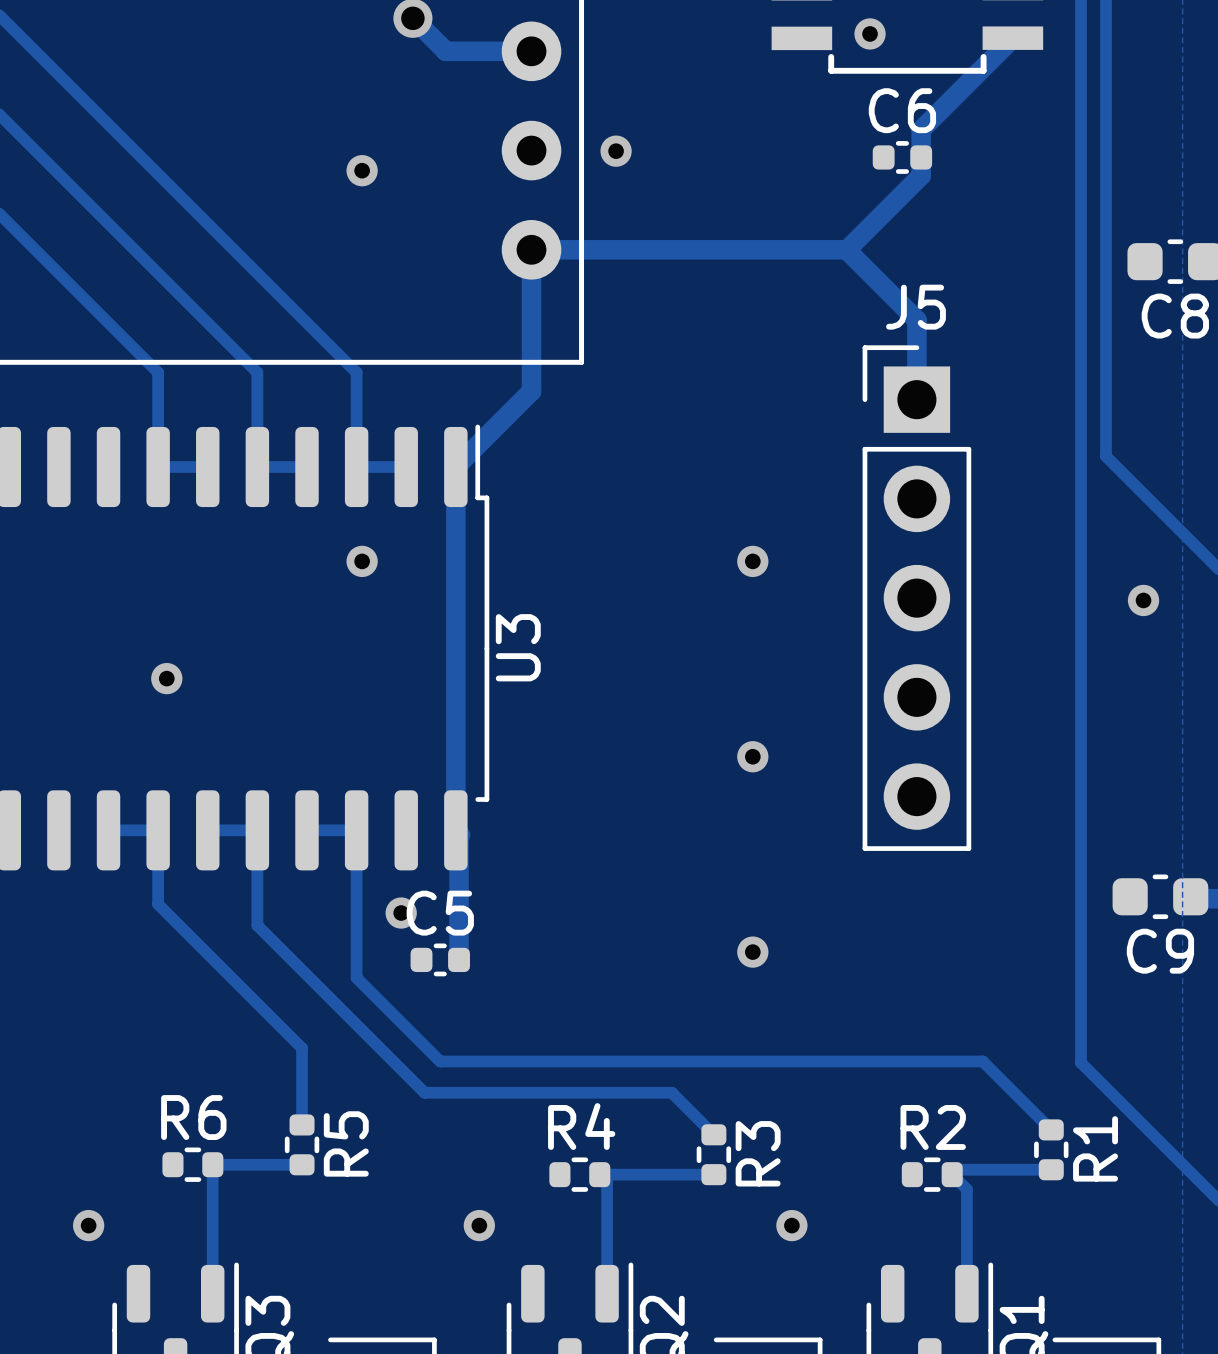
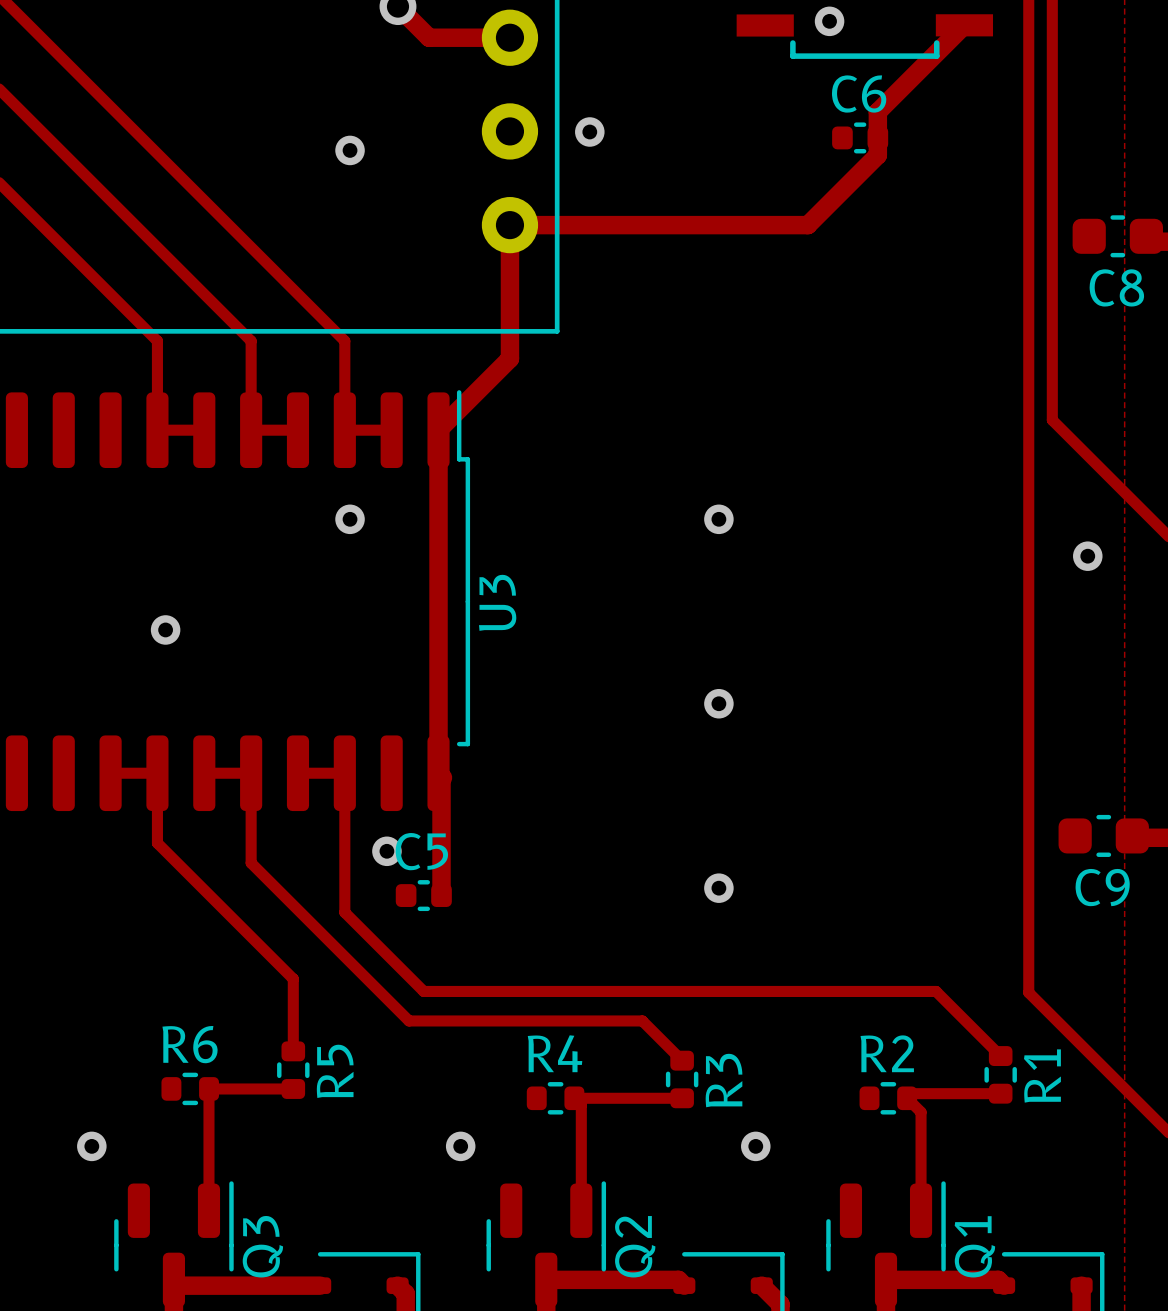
track: (846, 249) (916, 320) (916, 399) -> none
J5: (916, 598) -> none

